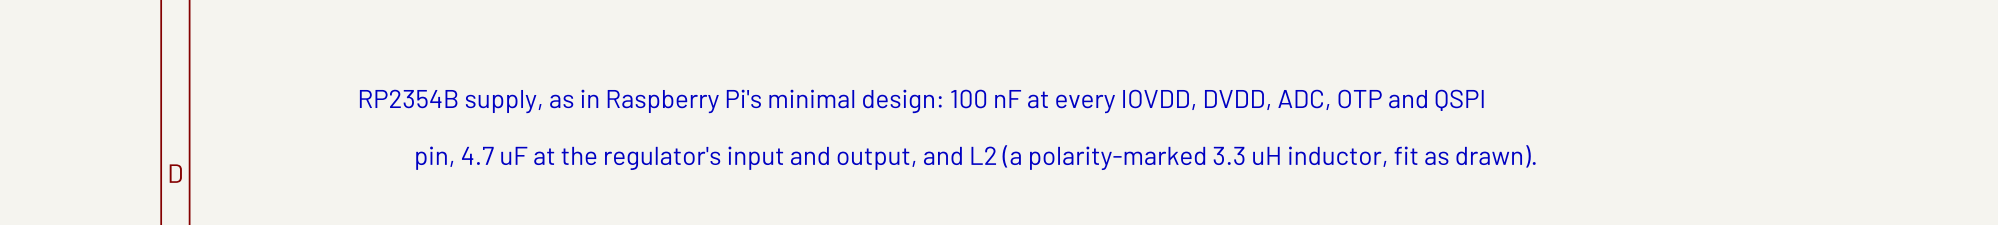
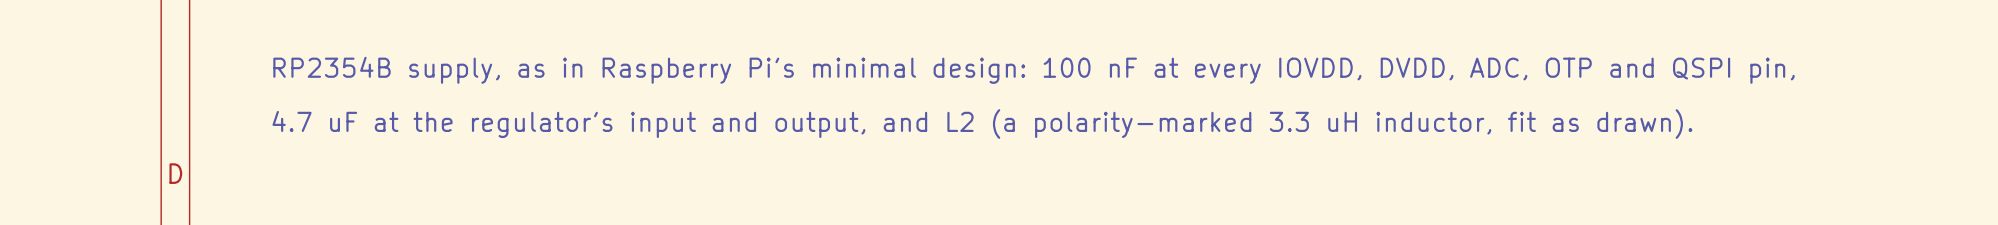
text: RP2354B supply, as in Raspberry Pi's minimal design: 100 nF at every IOVDD, DVDD, ADC, OTP and QSPI (921, 101) -> RP2354B supply, as in Raspberry Pi's minimal design: 100 nF at every IOVDD, DVDD, ADC, OTP and QSPI pin, (1033, 70)
text: pin, 4.7 uF at the regulator's input and output, and L2 (a polarity-marked 3.3 uH inductor, fit as drawn). (975, 157) -> 4.7 uF at the regulator's input and output, and L2 (a polarity-marked 3.3 uH inductor, fit as drawn). (982, 124)

